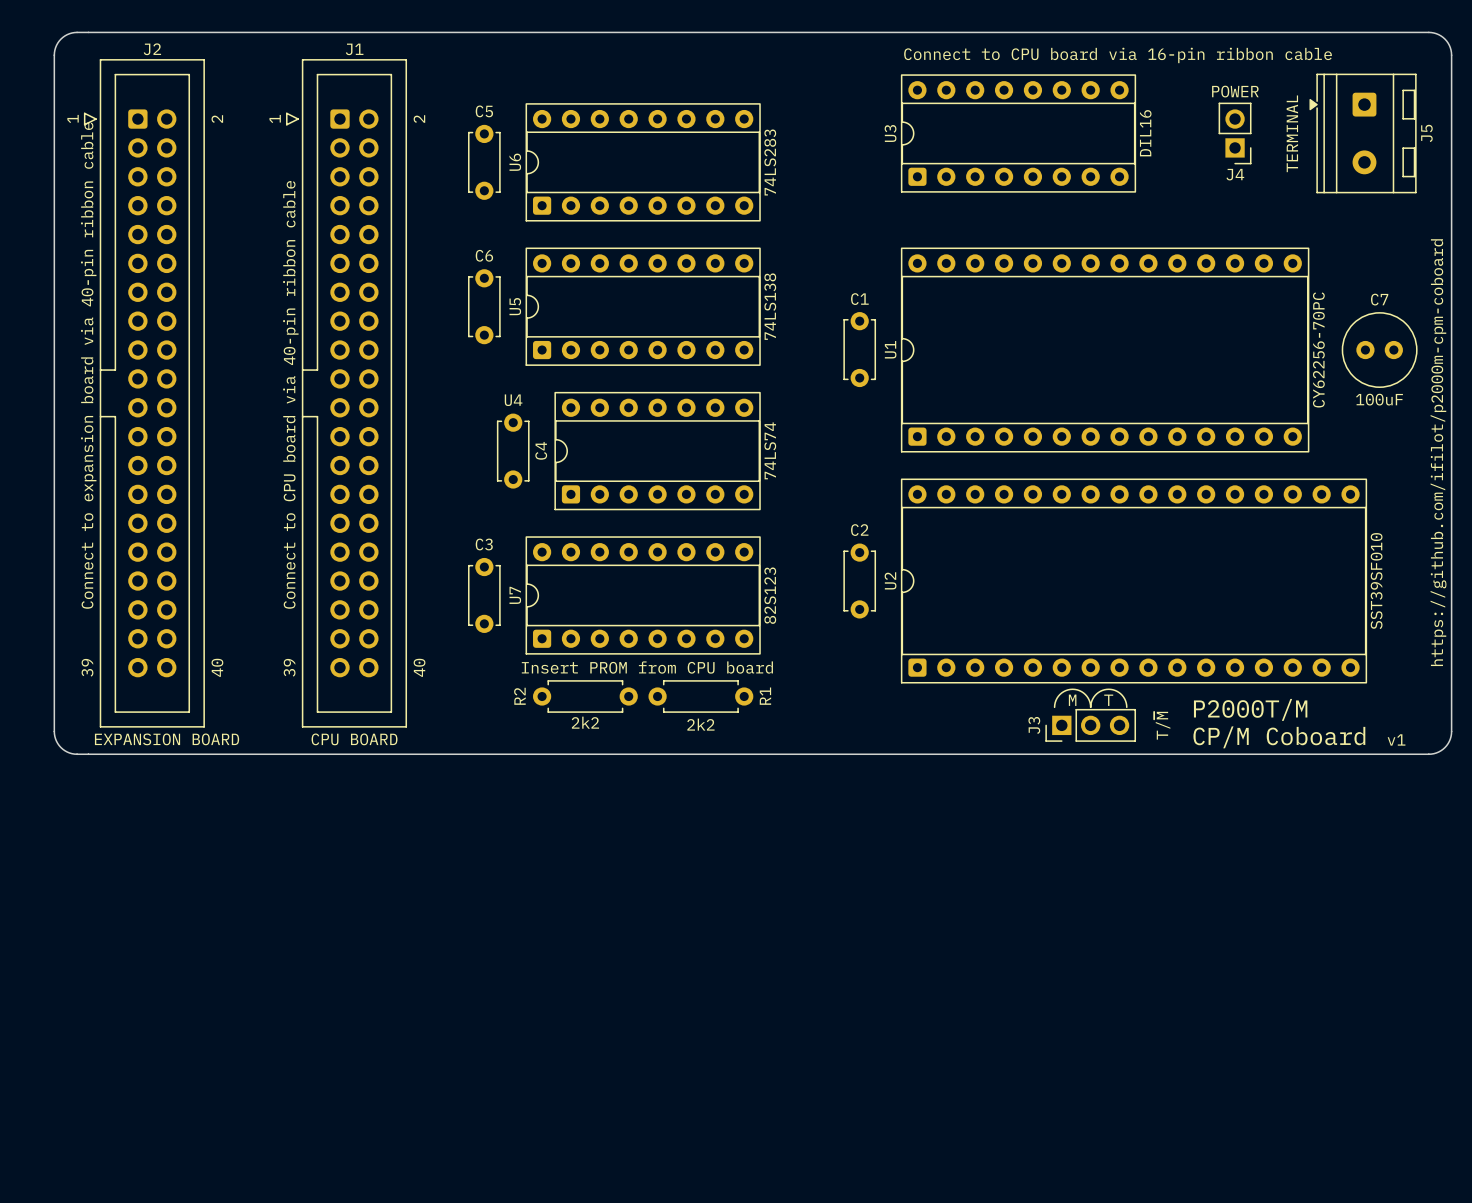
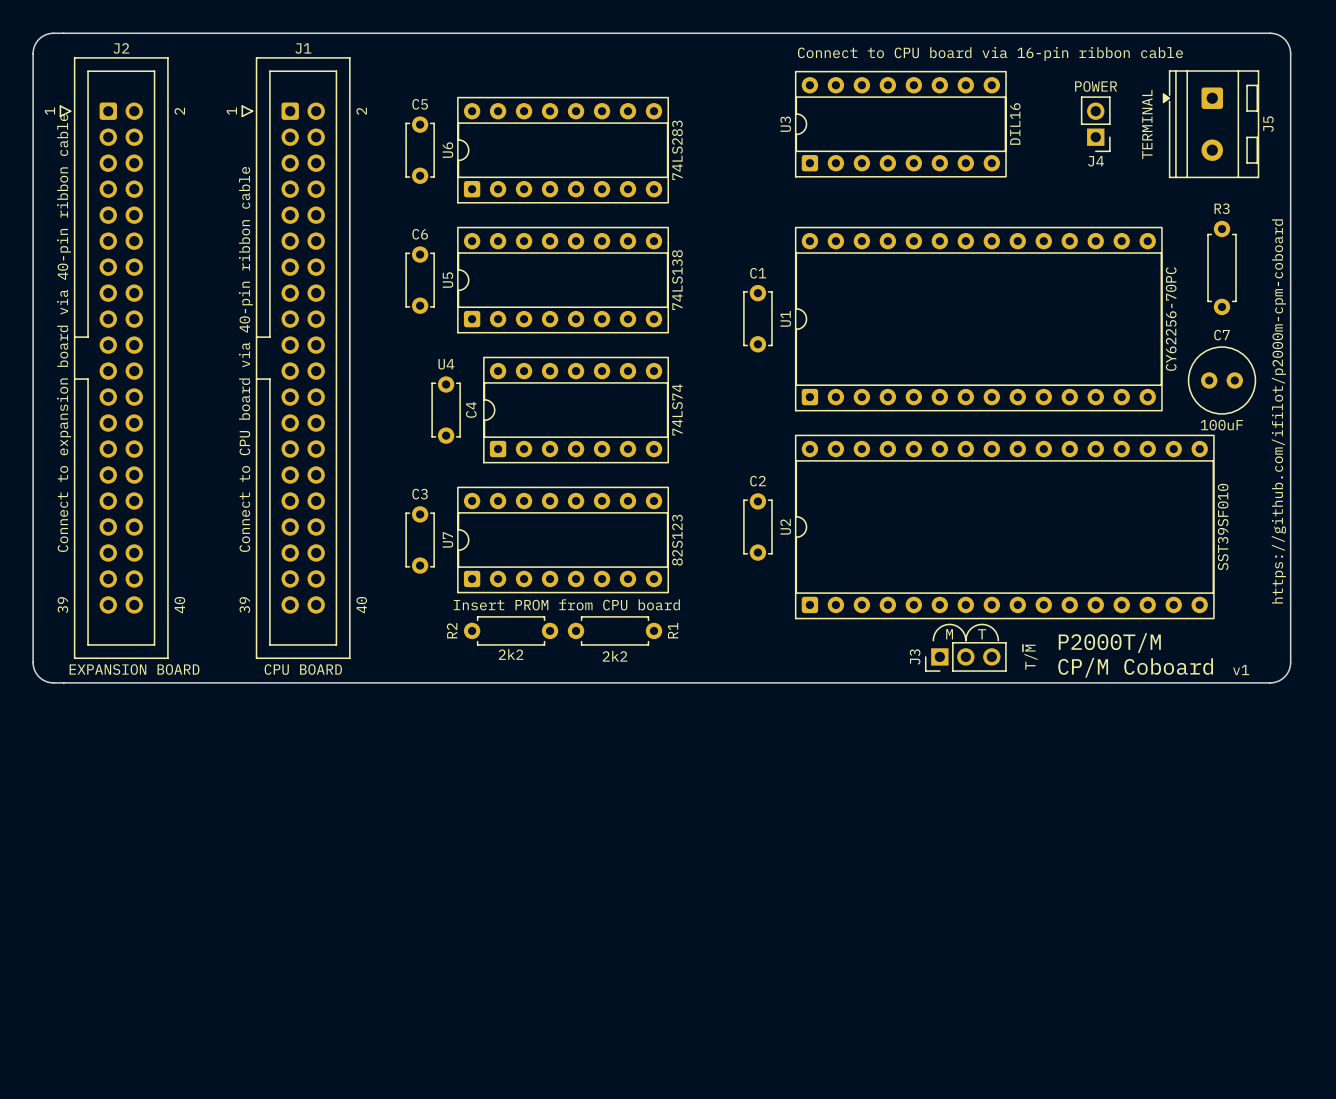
R3: none -> (1222, 267)
C7 position: (1379, 350) -> (1222, 380)

